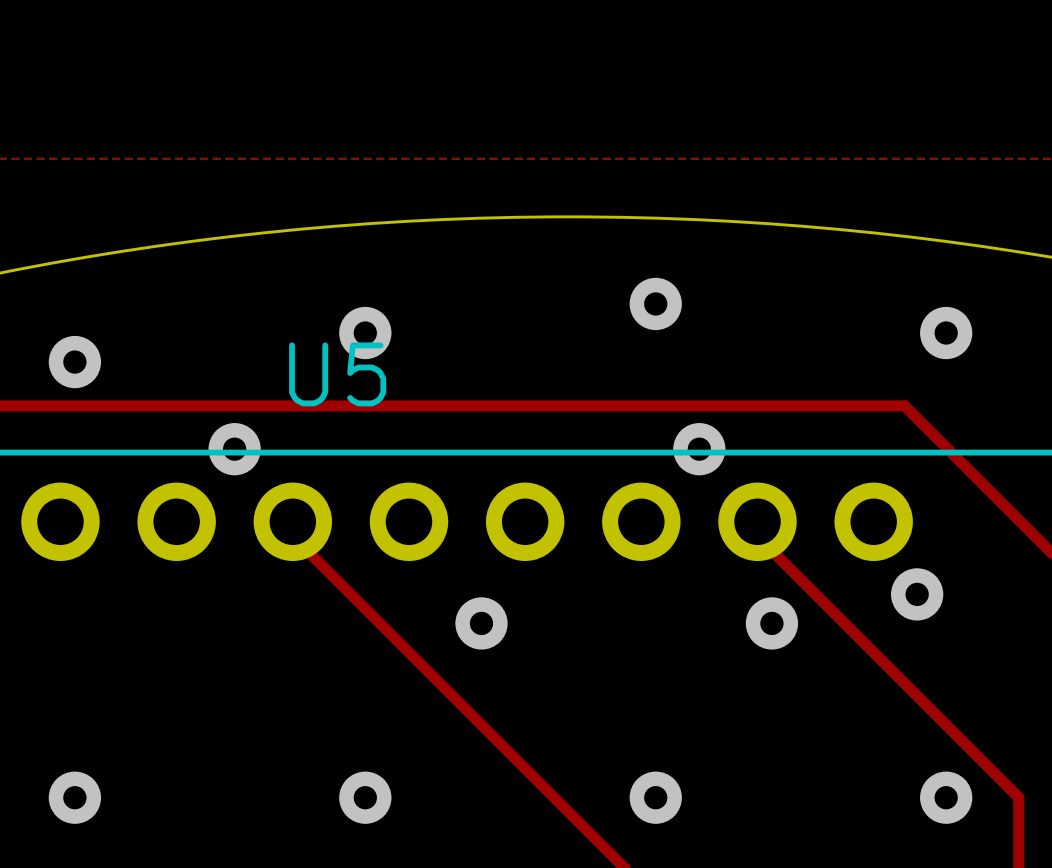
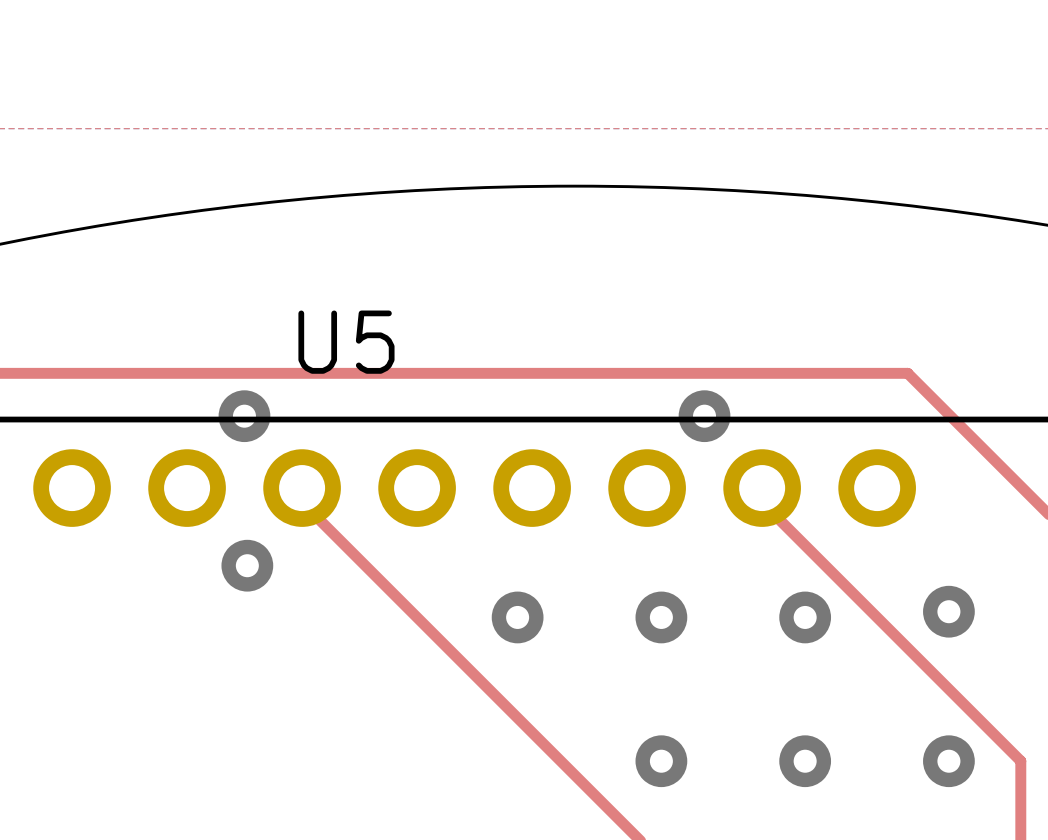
via: (655, 303) -> none
via: (365, 333) -> none
via: (946, 333) -> none
via: (74, 362) -> none
via position: (917, 594) -> (948, 611)
via: none -> (247, 565)
via position: (481, 623) -> (517, 617)
via position: (771, 623) -> (805, 617)
via: none -> (661, 617)
via: (74, 797) -> none
via: (365, 797) -> none
via: none -> (805, 761)

